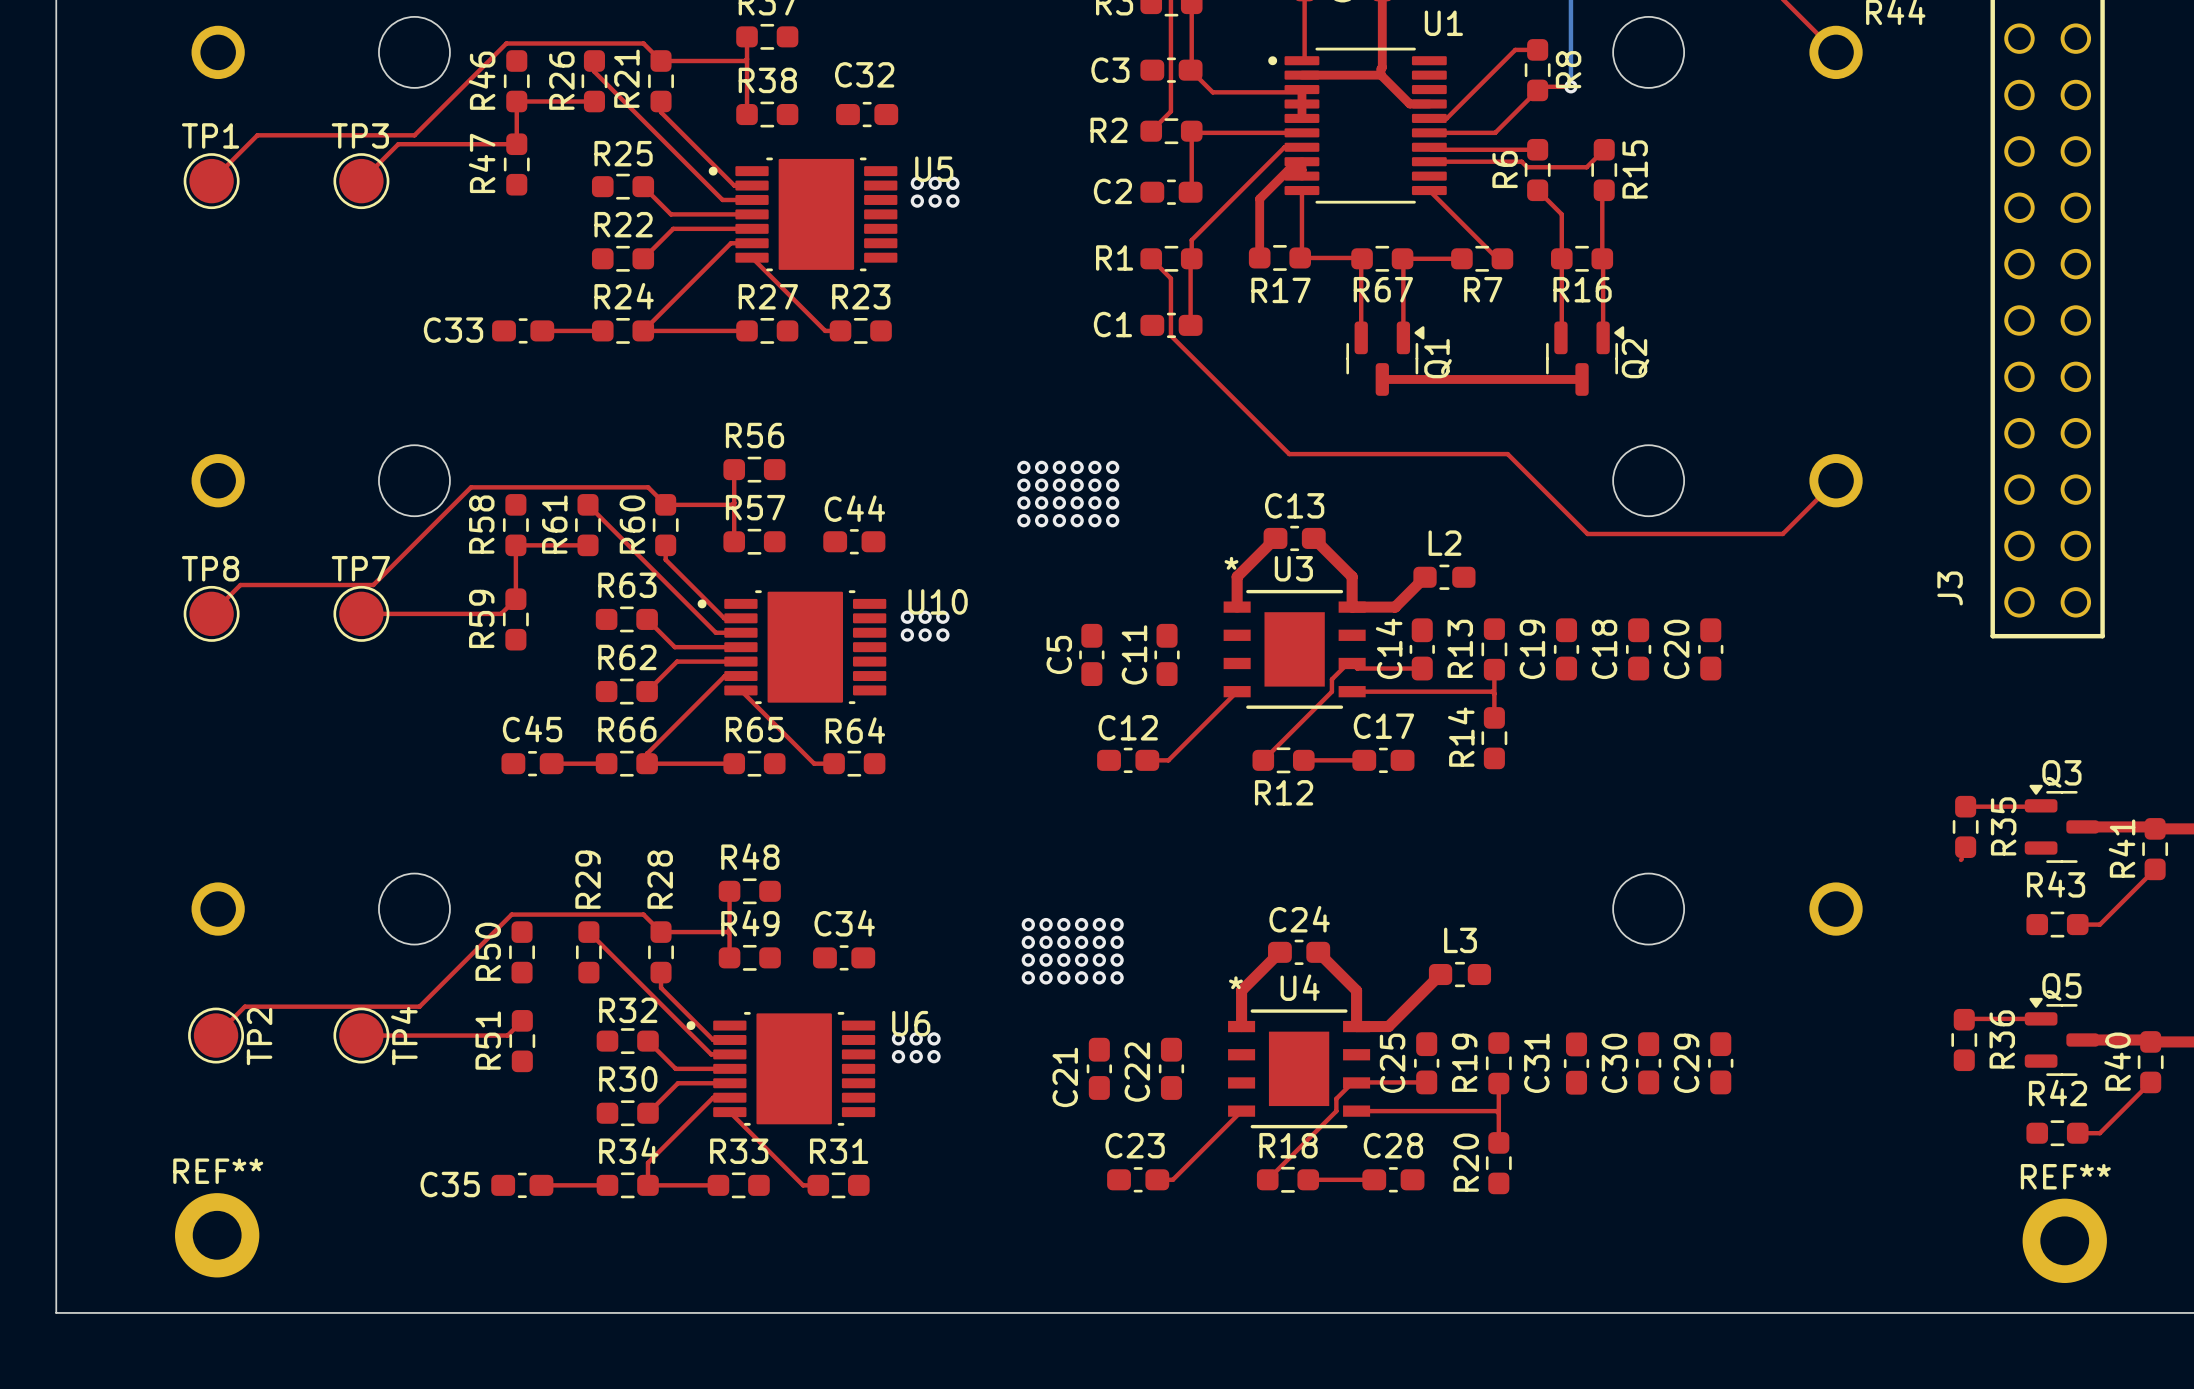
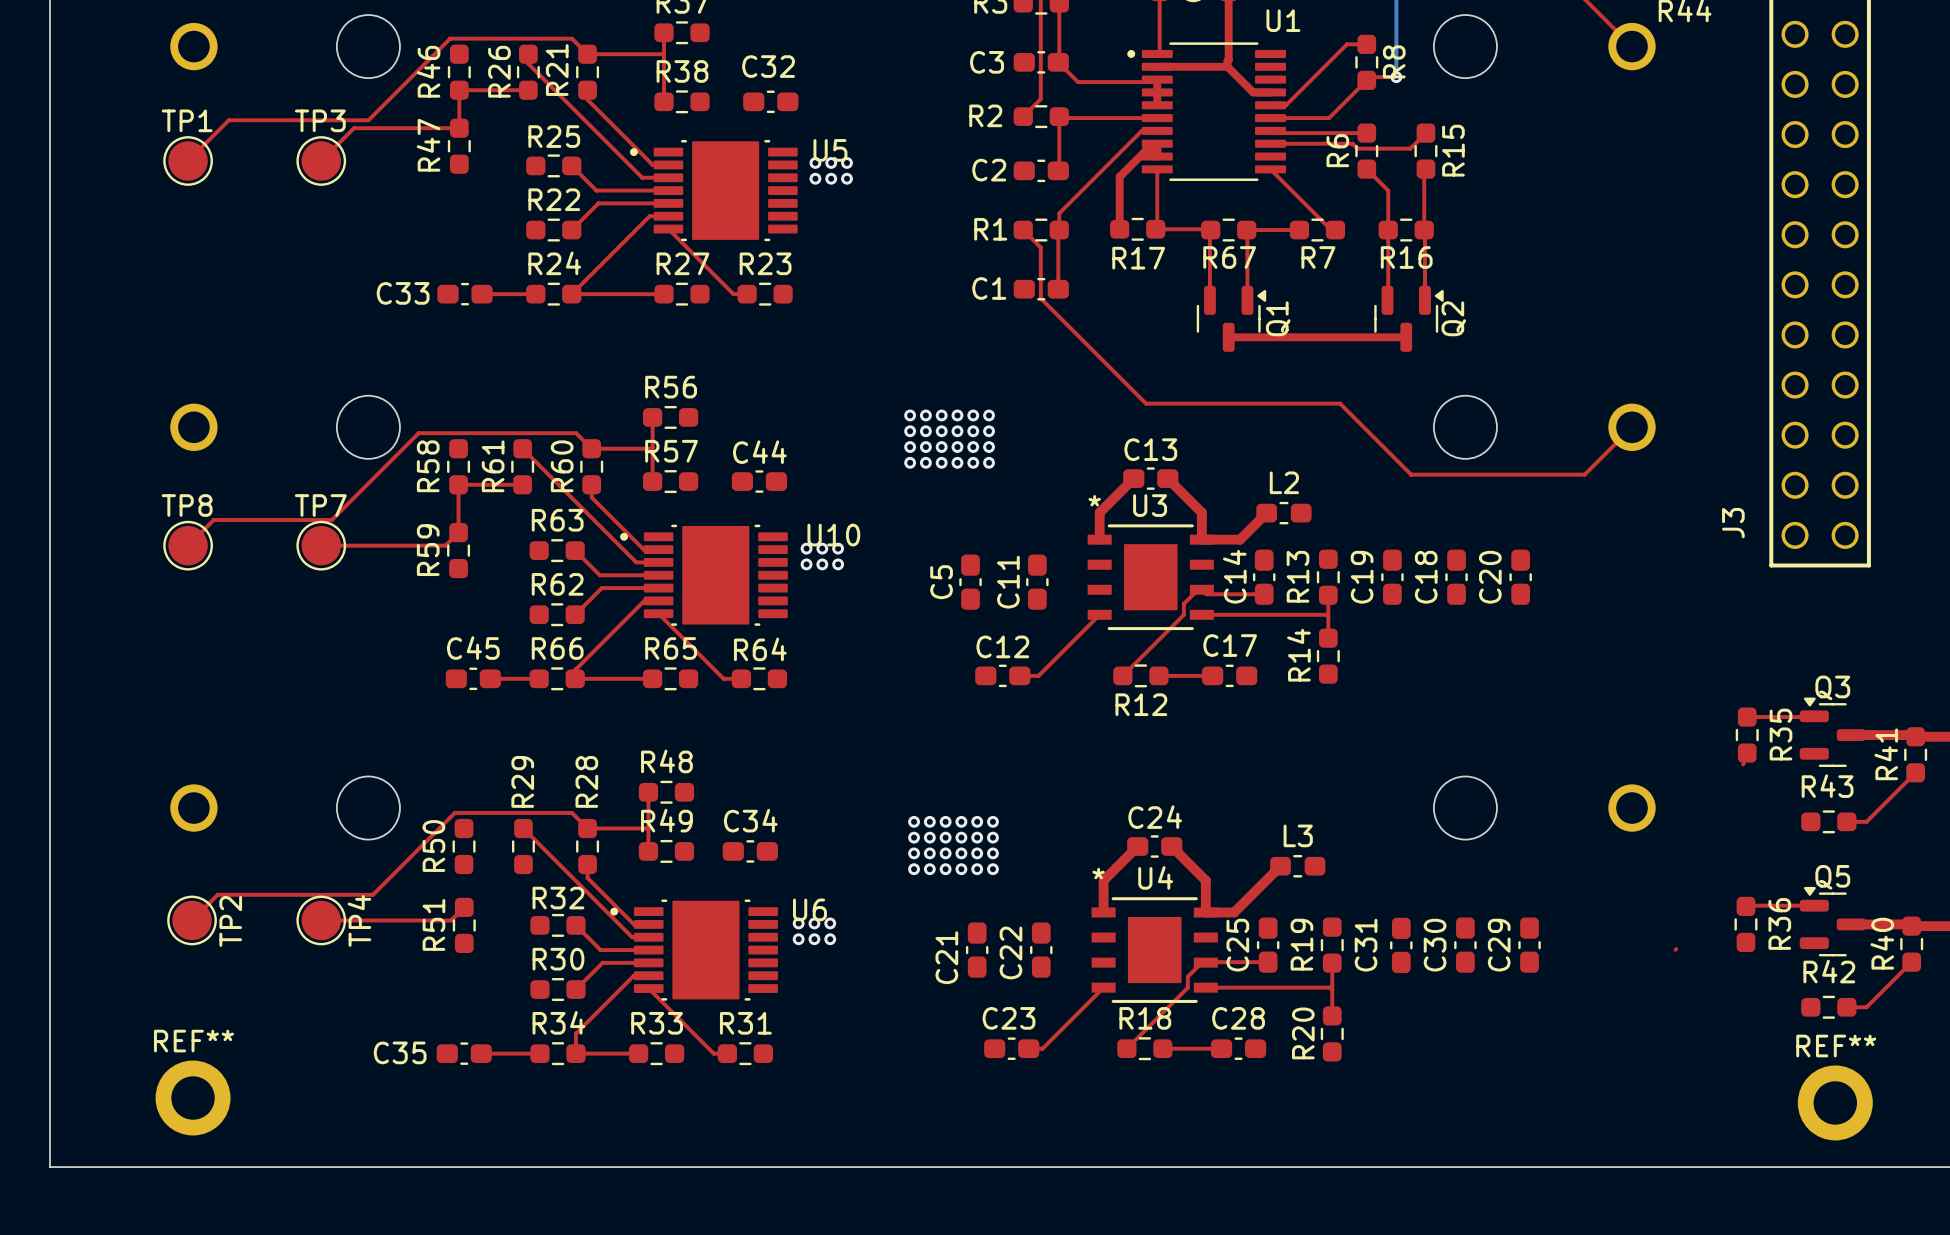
top track: none -> (1676, 949) (1675, 949)

